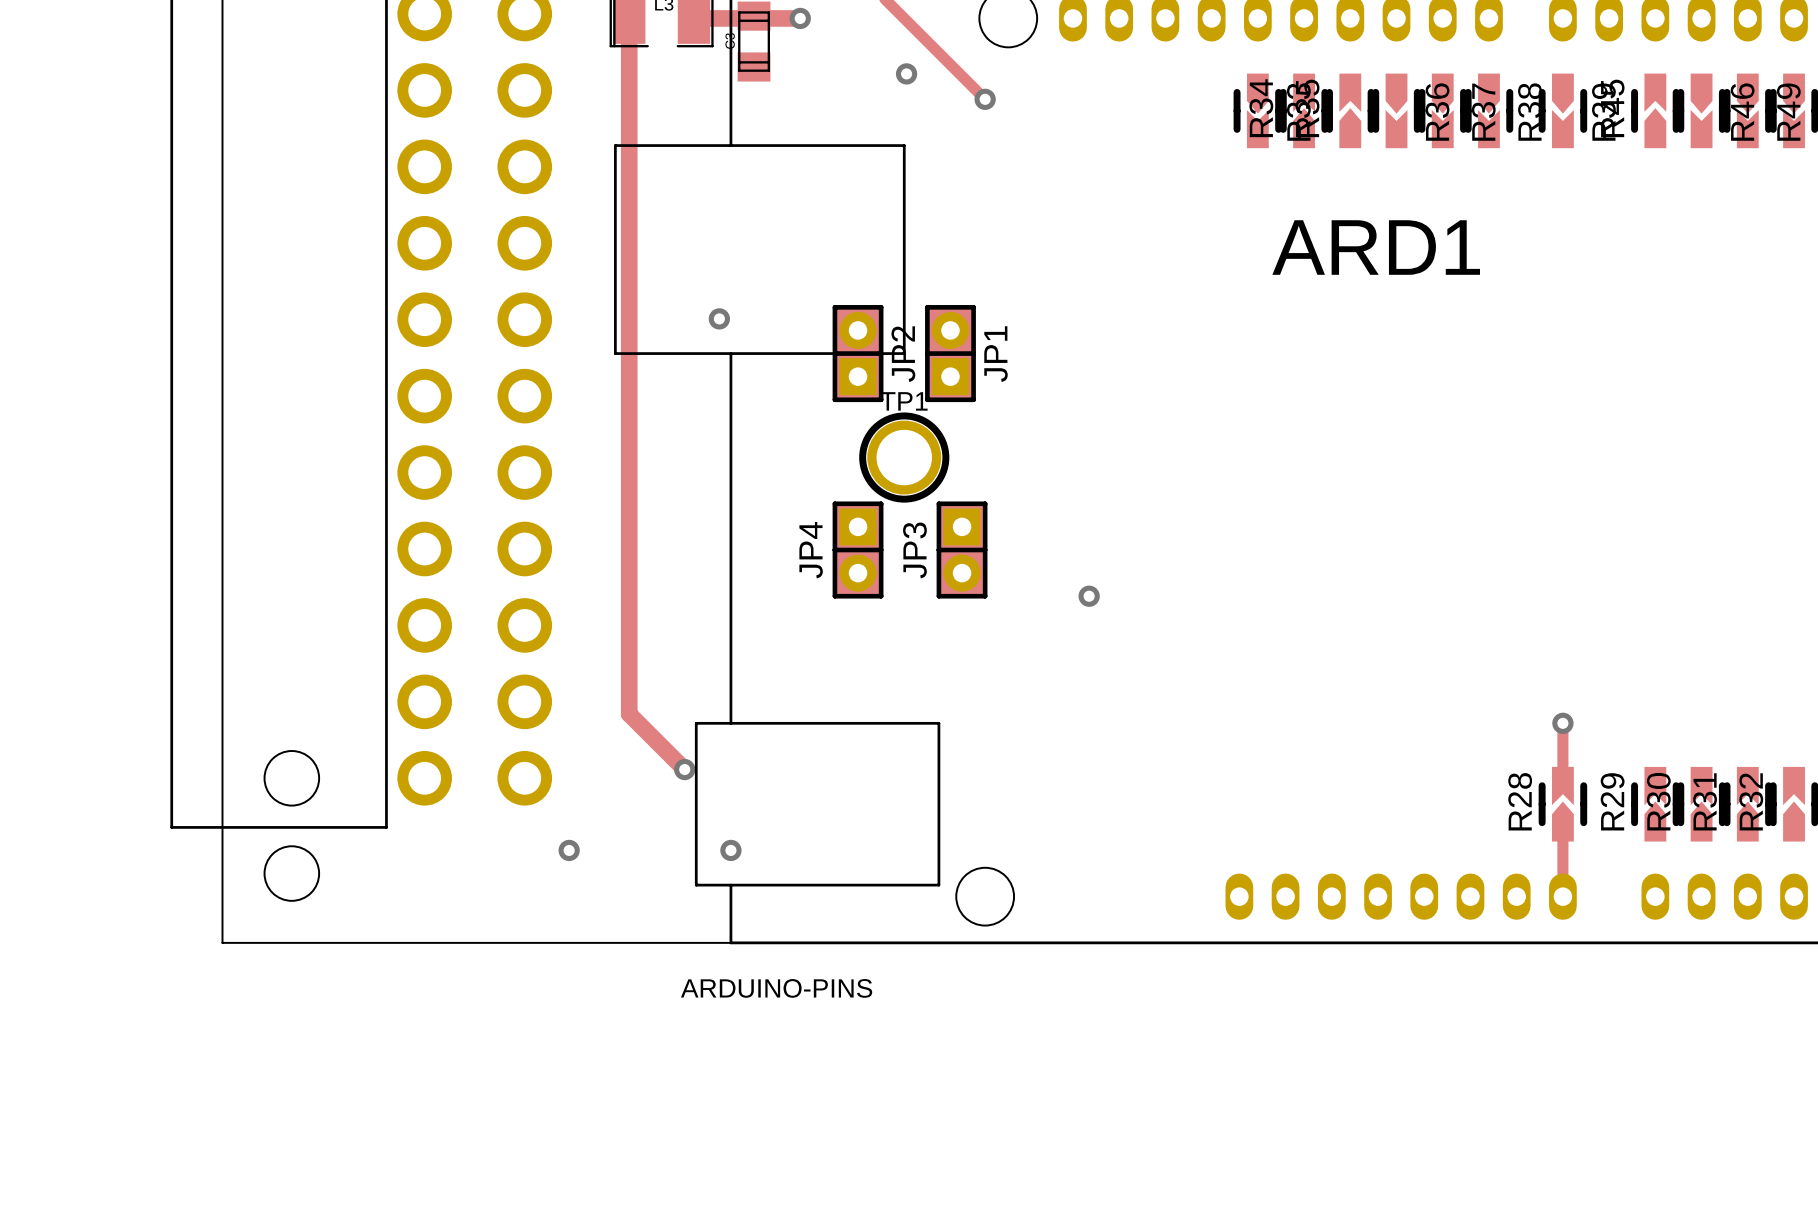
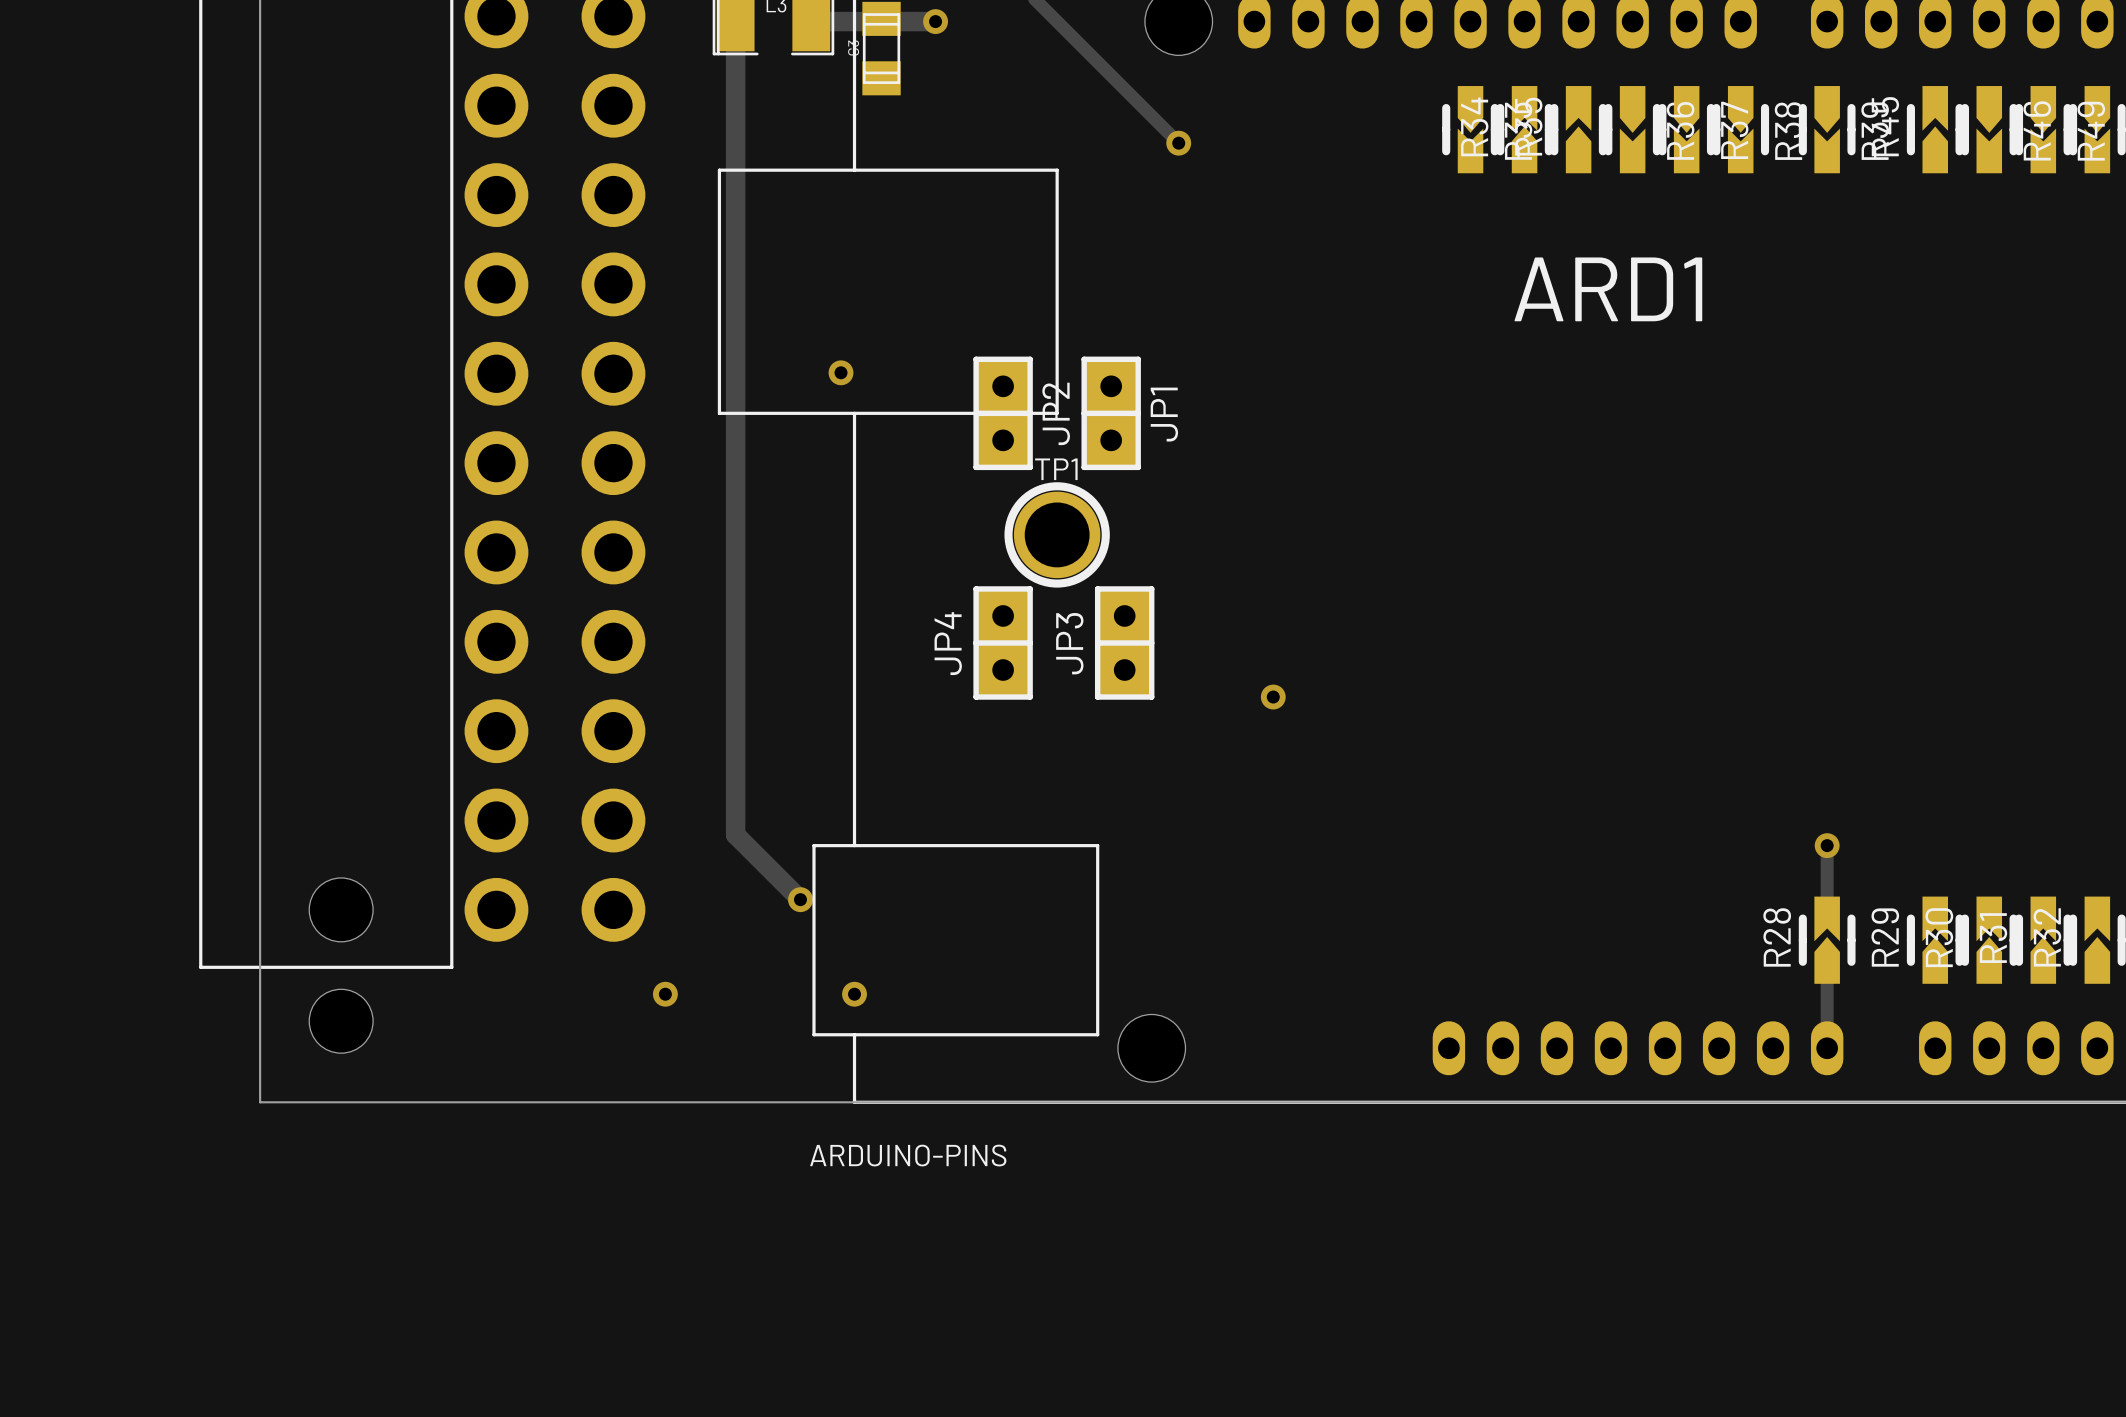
via: (906, 73) -> none
track: none -> (1151, 116) (1178, 143)
via position: (985, 99) -> (1178, 143)

